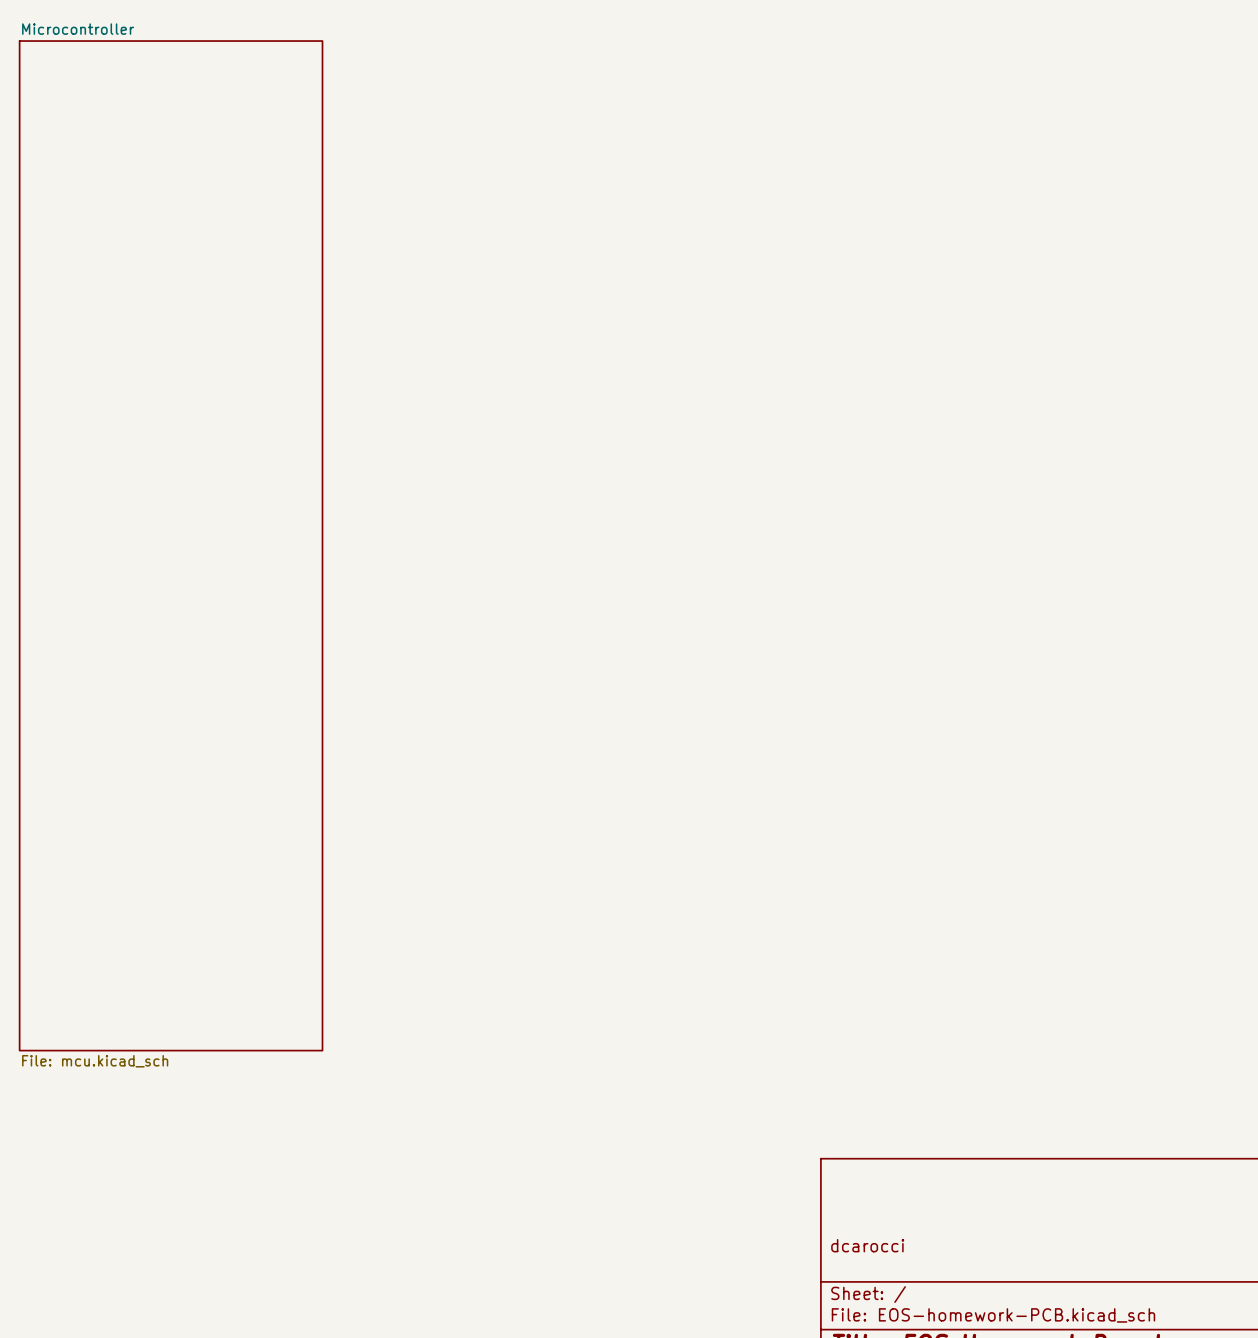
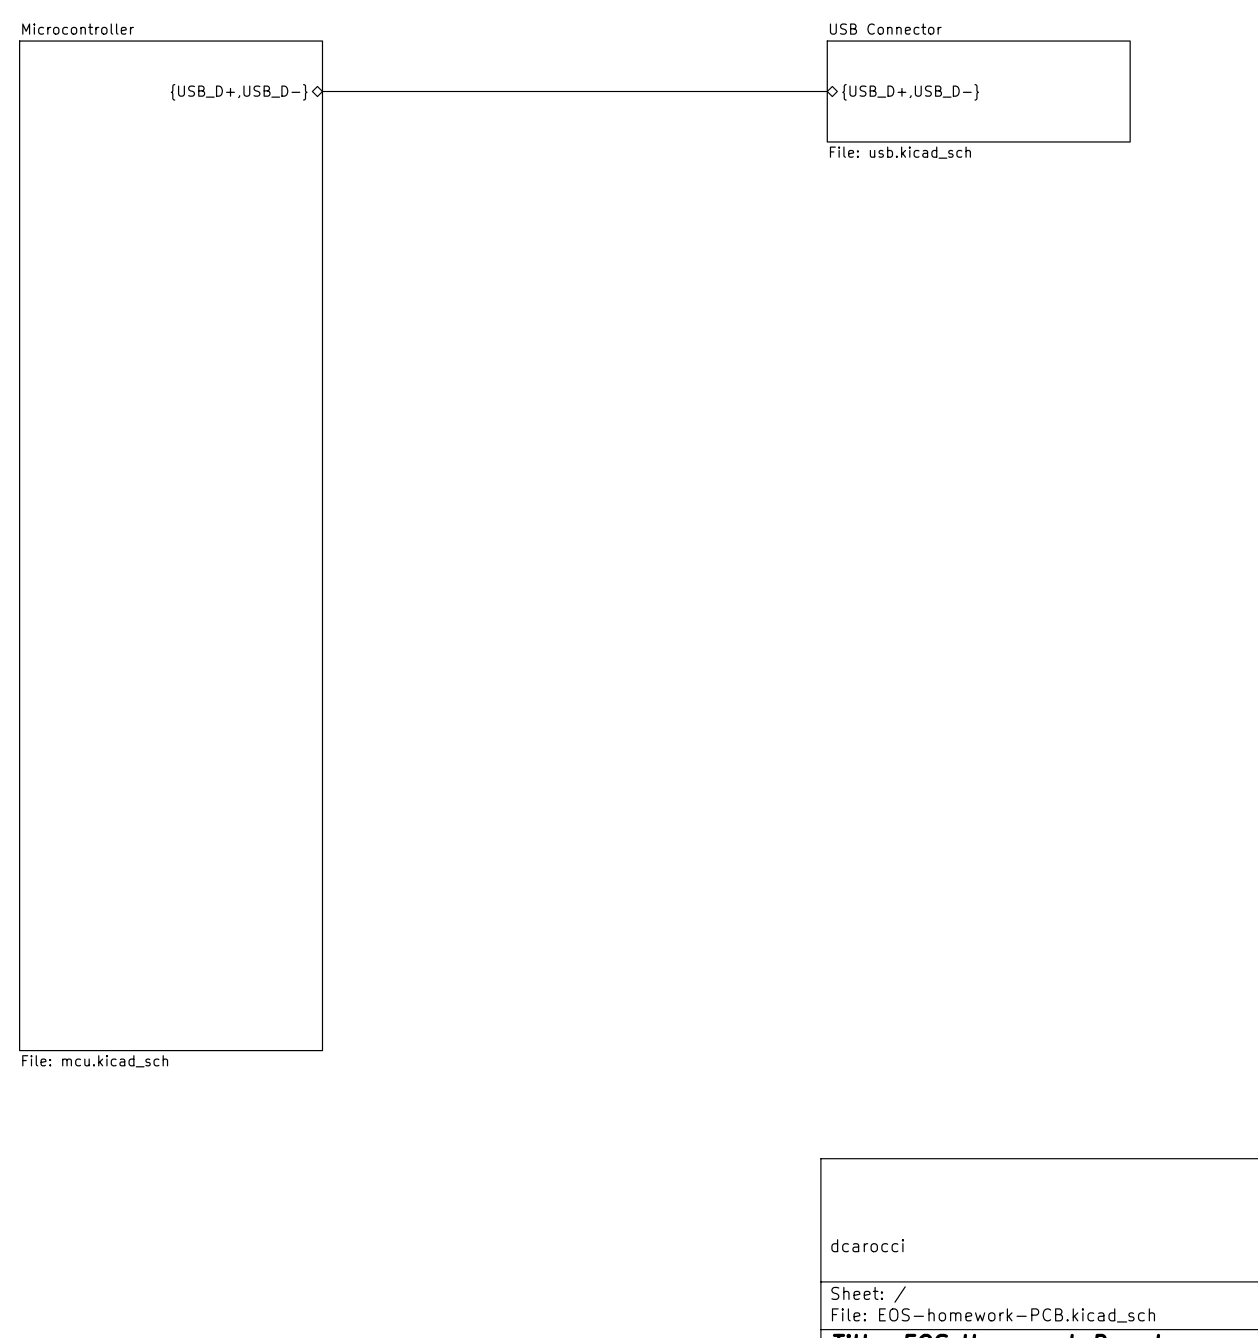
bus: none -> (322, 91) (827, 91)
sheet USB Connector: none -> File: usb.kicad_sch (978, 91)
sheet pin: none -> {USB_D+,USB_D-} (239, 92)
sheet pin: none -> {USB_D+,USB_D-} (910, 92)

